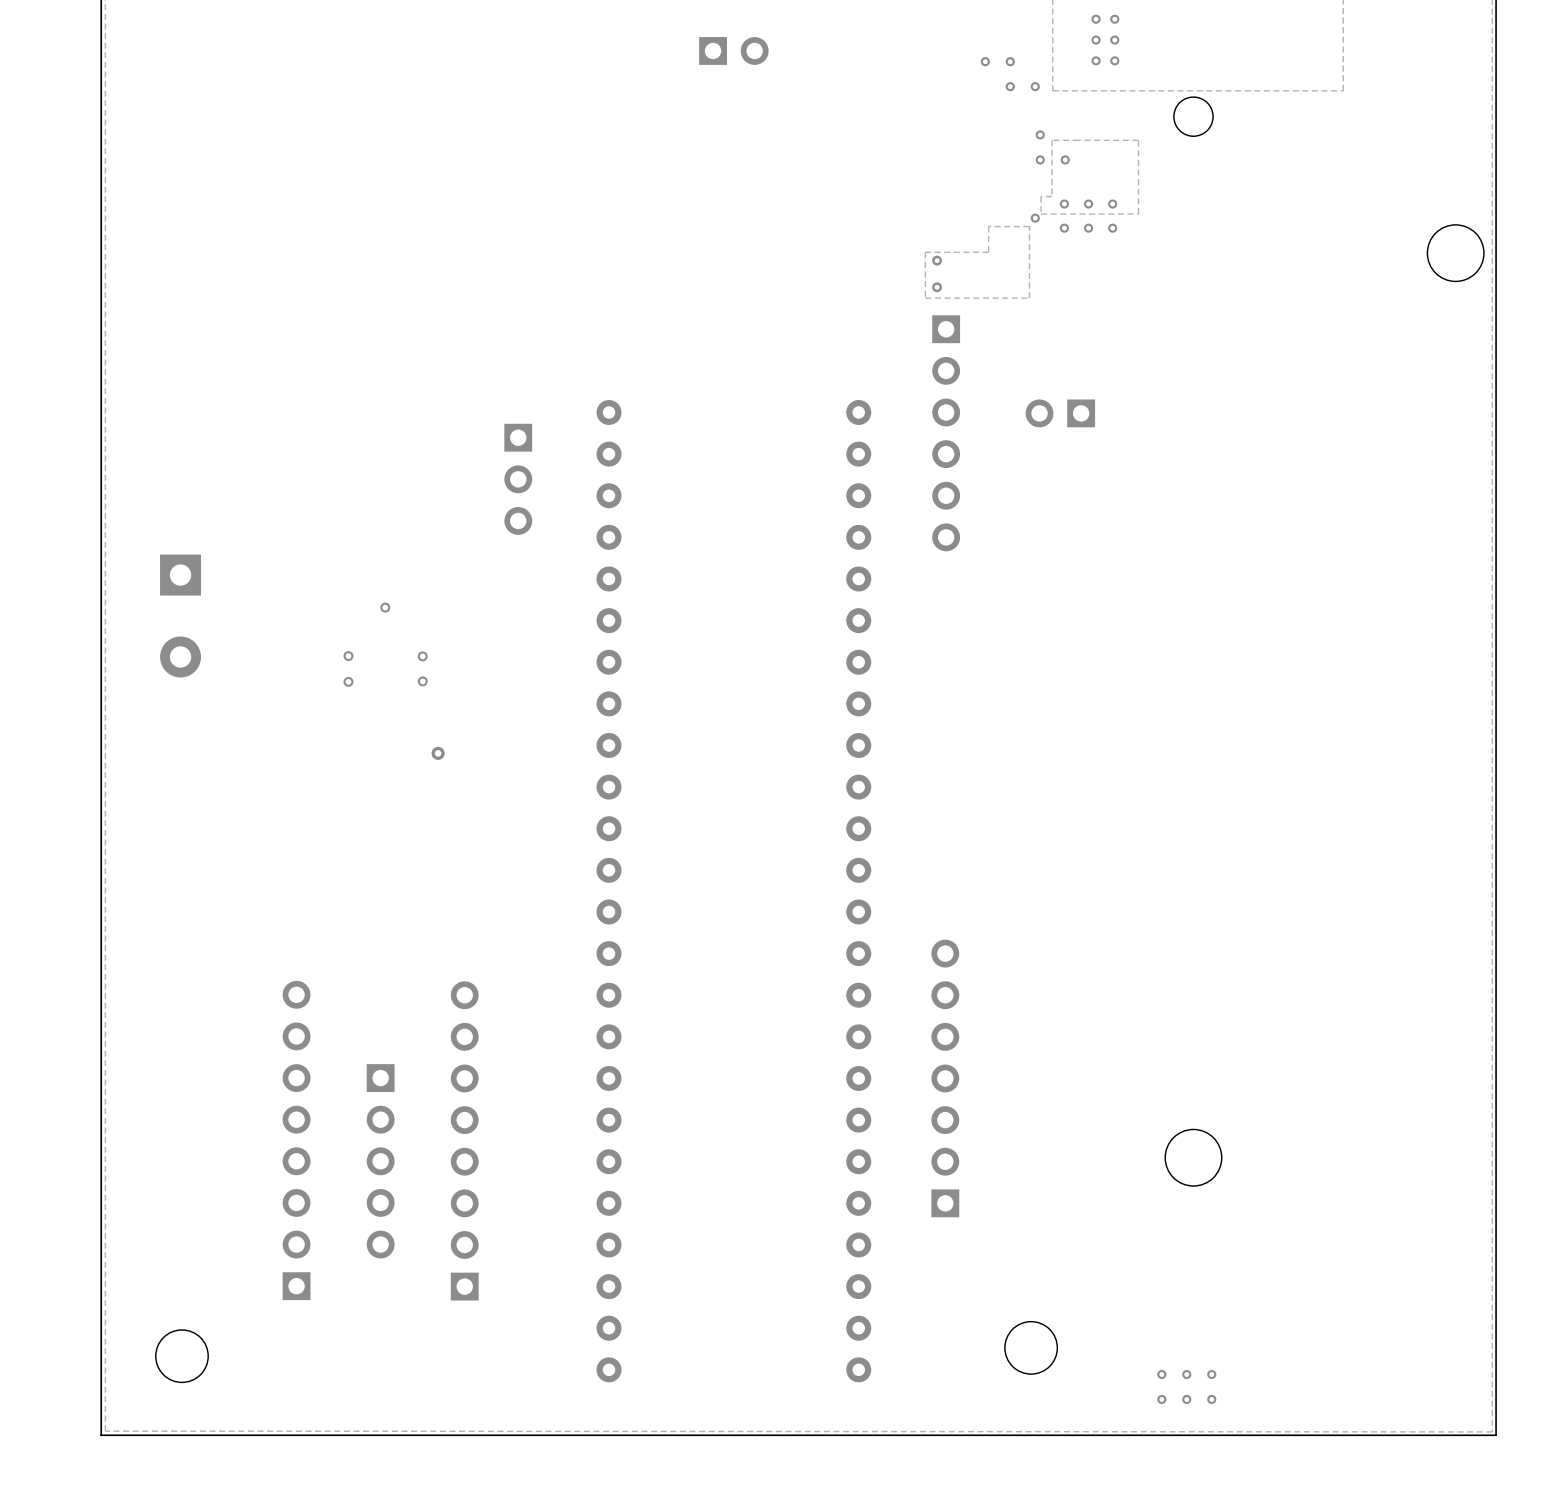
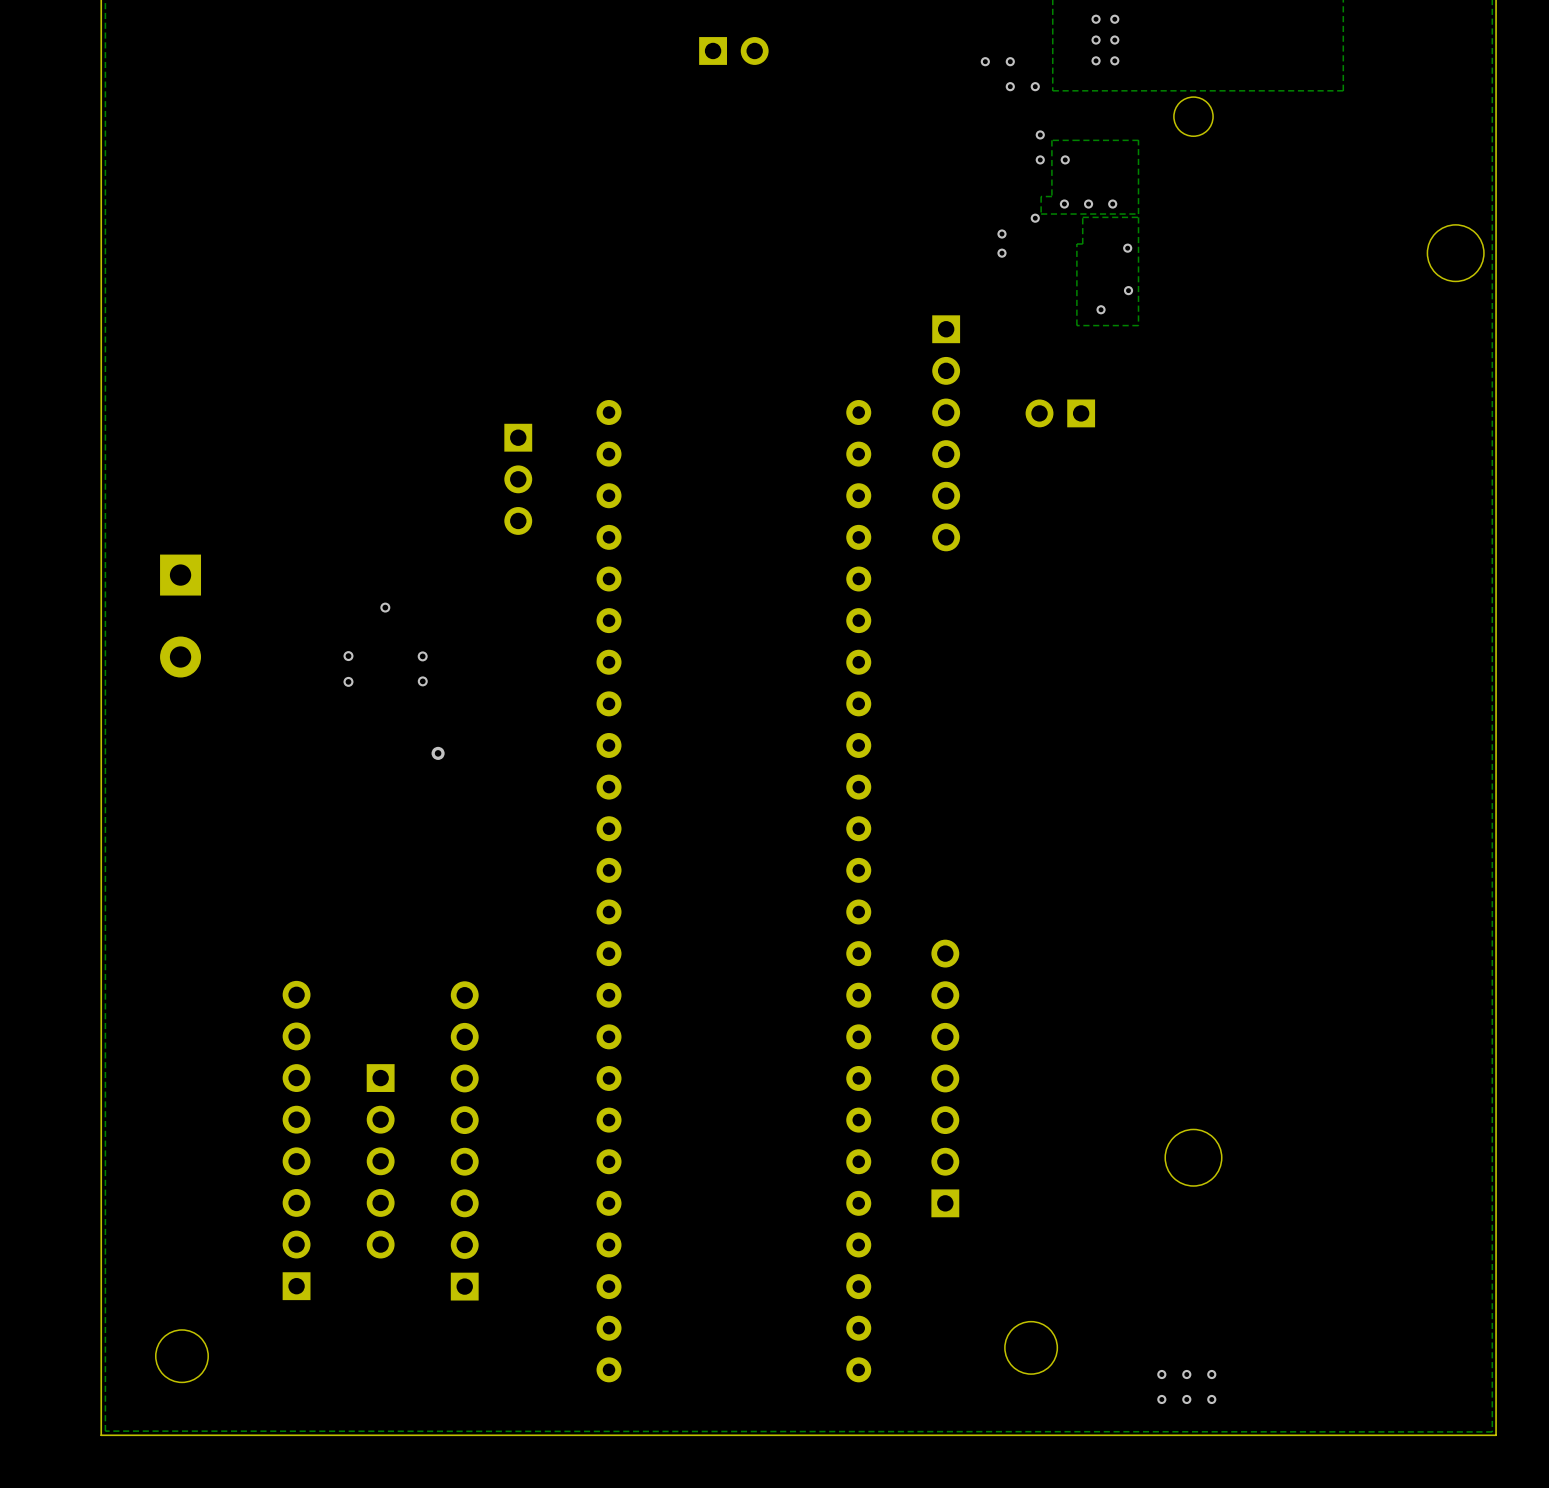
zone outline: none -> (1138, 217) (1082, 217) (1082, 244) (1076, 244) (1076, 325) (1138, 325) (1138, 217)
zone outline: (1029, 226) (988, 226) (988, 252) (925, 252) (925, 298) (1029, 298) (1029, 226) -> none
via: (1064, 228) -> none
via: (1088, 228) -> none
via: (1112, 228) -> none
via: none -> (1001, 234)
via: none -> (1127, 248)
via: none -> (1001, 253)
via: (937, 260) -> none
via: (937, 287) -> none
via: none -> (1128, 290)
via: none -> (1101, 309)

